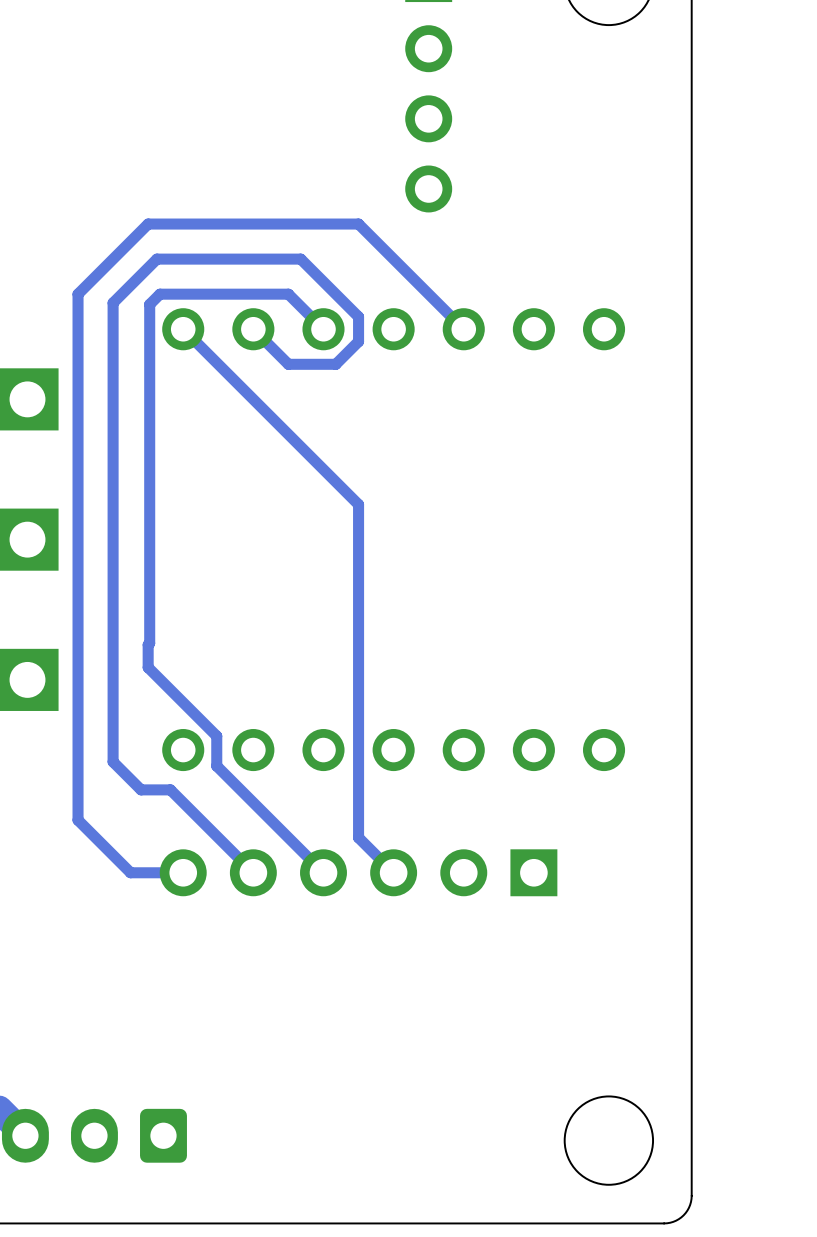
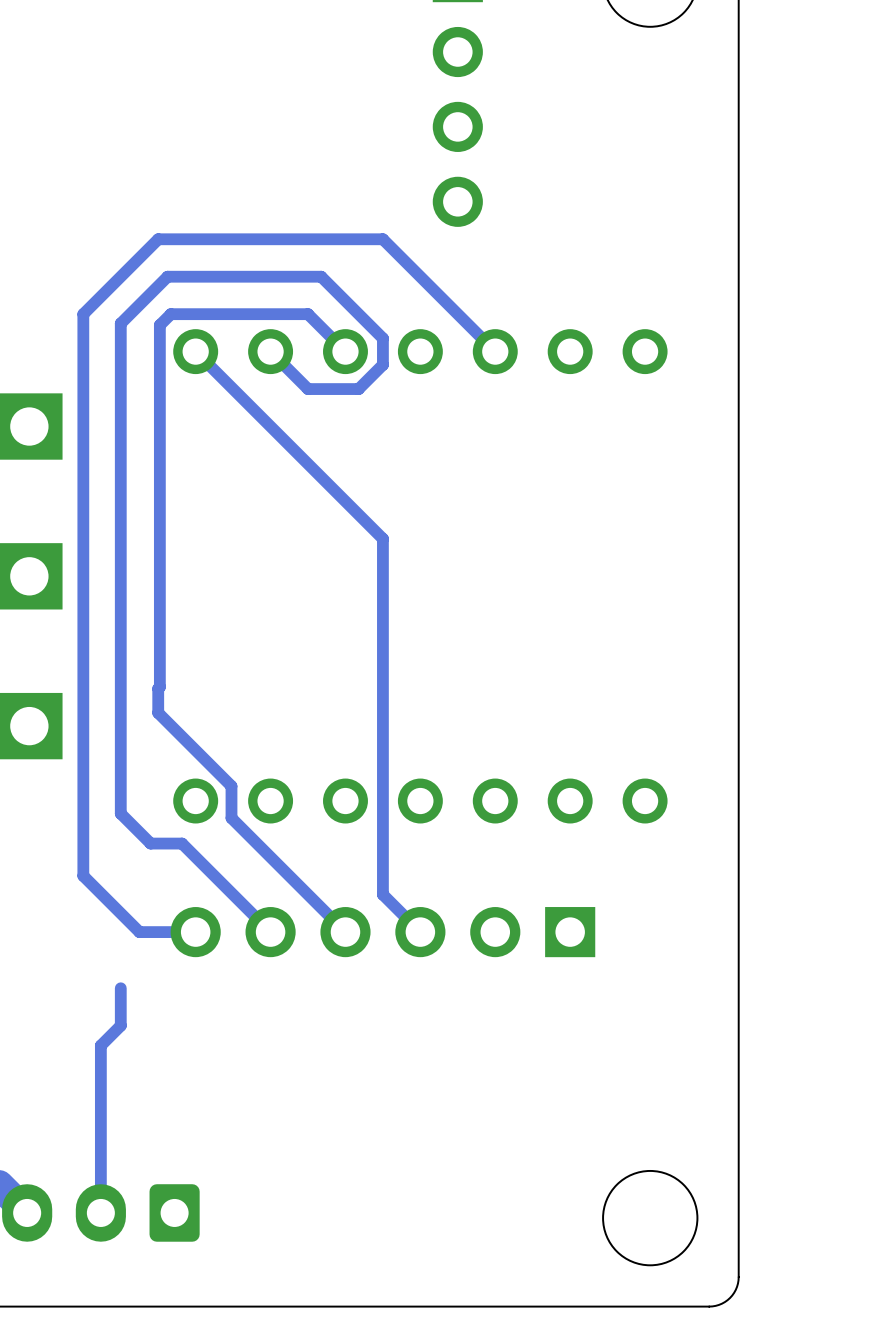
track: none -> (120, 988) (120, 1025) (100, 1045) (100, 1212)

